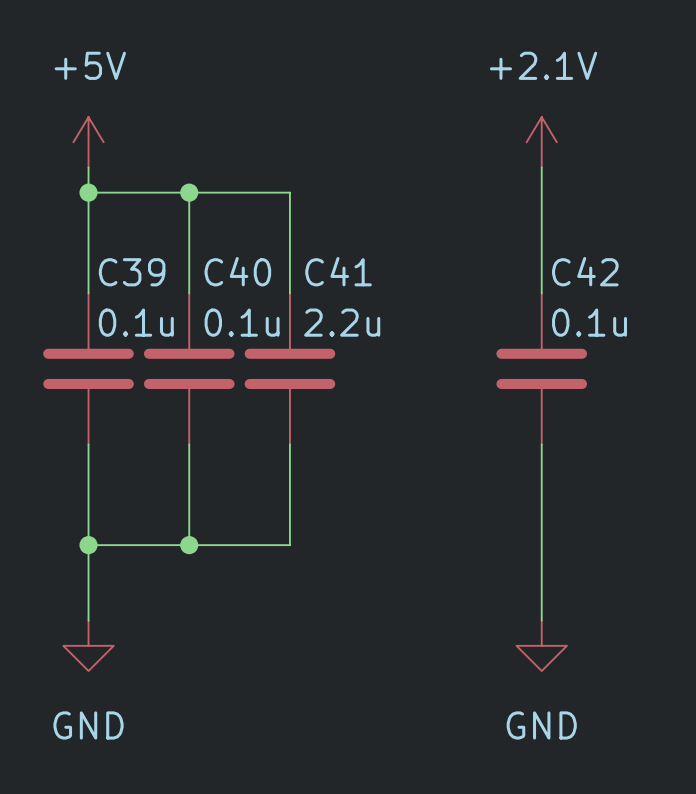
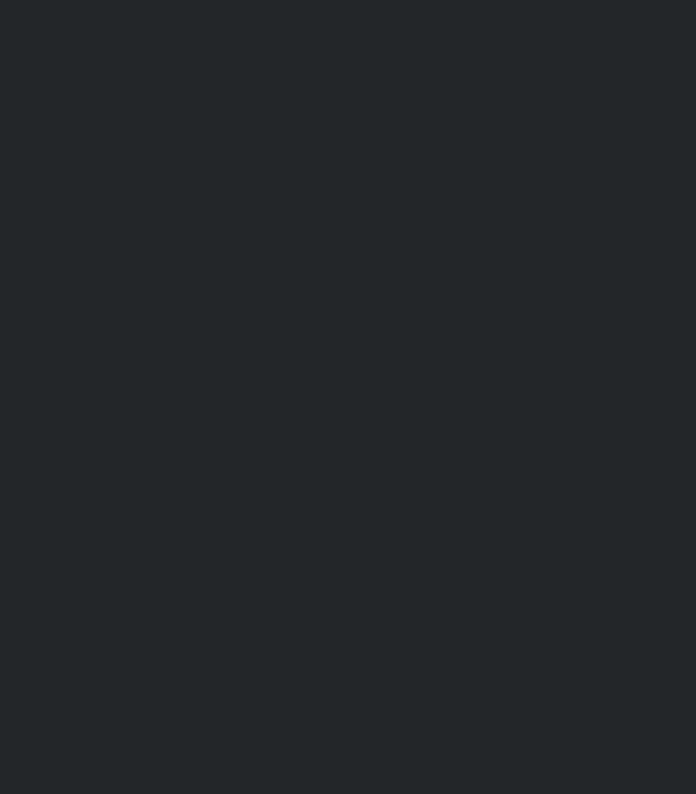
power symbol: +5V (88, 142) -> none
power symbol: +2.1V (541, 142) -> none
wire: (88, 167) (88, 293) -> none
wire: (541, 167) (541, 293) -> none
wire: (88, 192) (289, 192) (289, 293) -> none
junction: (88, 192) -> none
wire: (189, 192) (189, 293) -> none
junction: (189, 192) -> none
C39: 0.1u (88, 368) -> none
C40: 0.1u (189, 368) -> none
C41: 2.2u (289, 368) -> none
C42: 0.1u (541, 368) -> none
wire: (88, 444) (88, 620) -> none
wire: (189, 444) (189, 545) -> none
wire: (289, 444) (289, 545) (88, 545) -> none
wire: (541, 444) (541, 620) -> none
junction: (88, 545) -> none
junction: (189, 545) -> none
power symbol: GND (88, 645) -> none
power symbol: GND (541, 645) -> none

